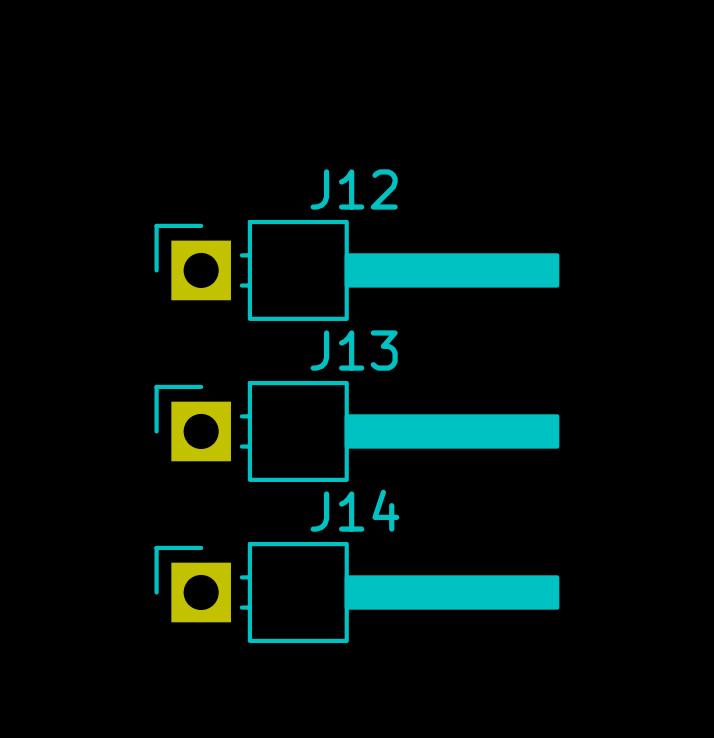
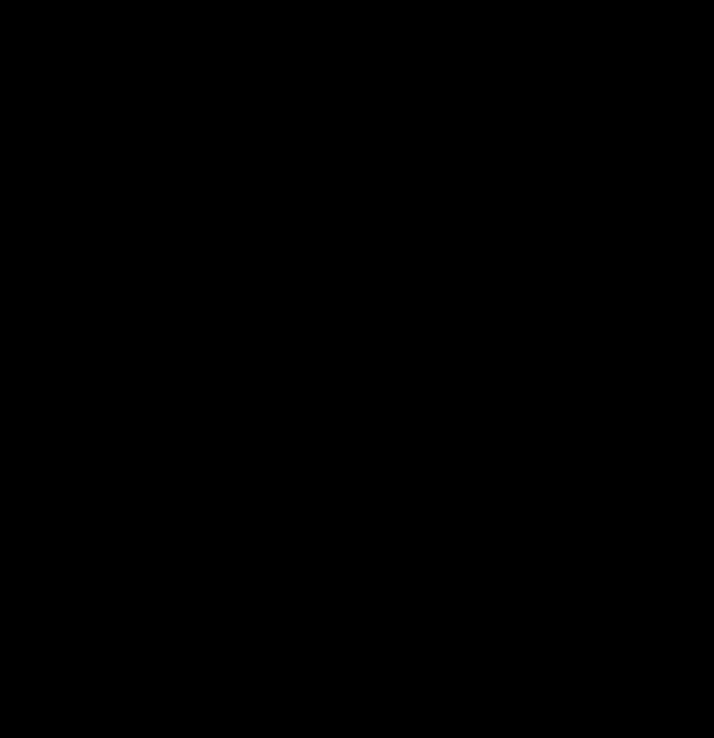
J12: (356, 270) -> none
J13: (356, 431) -> none
J14: (356, 592) -> none

